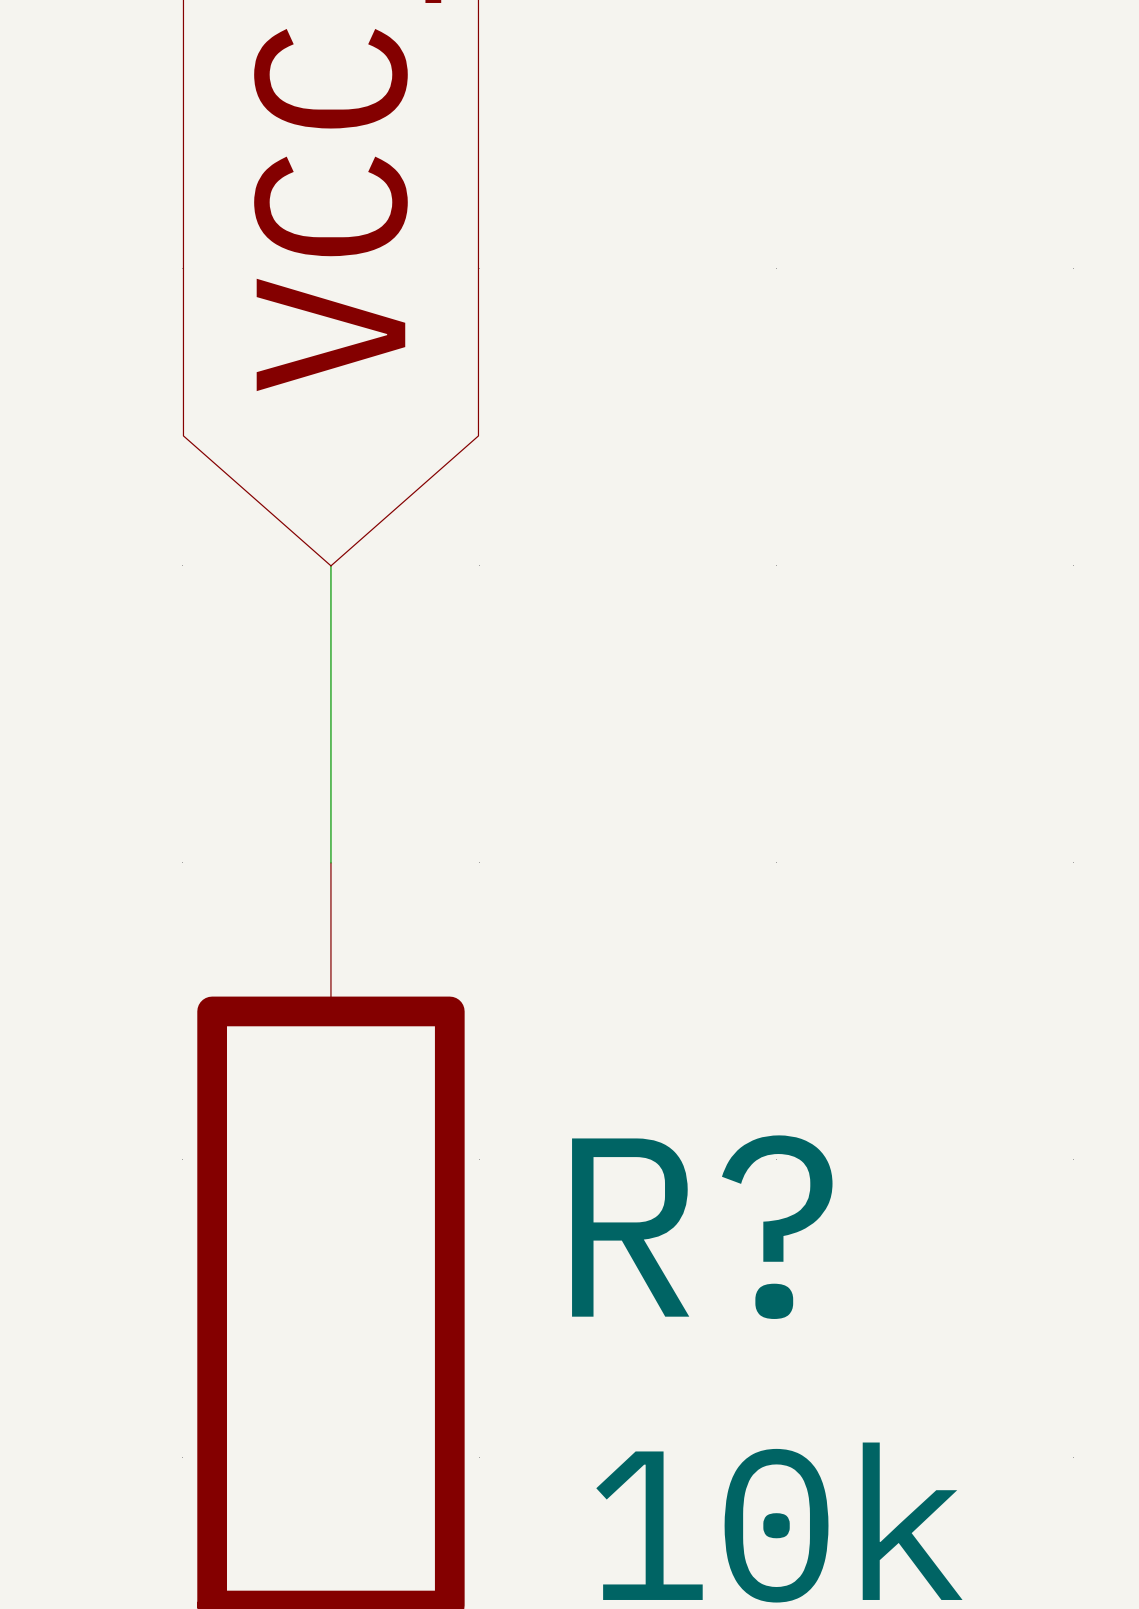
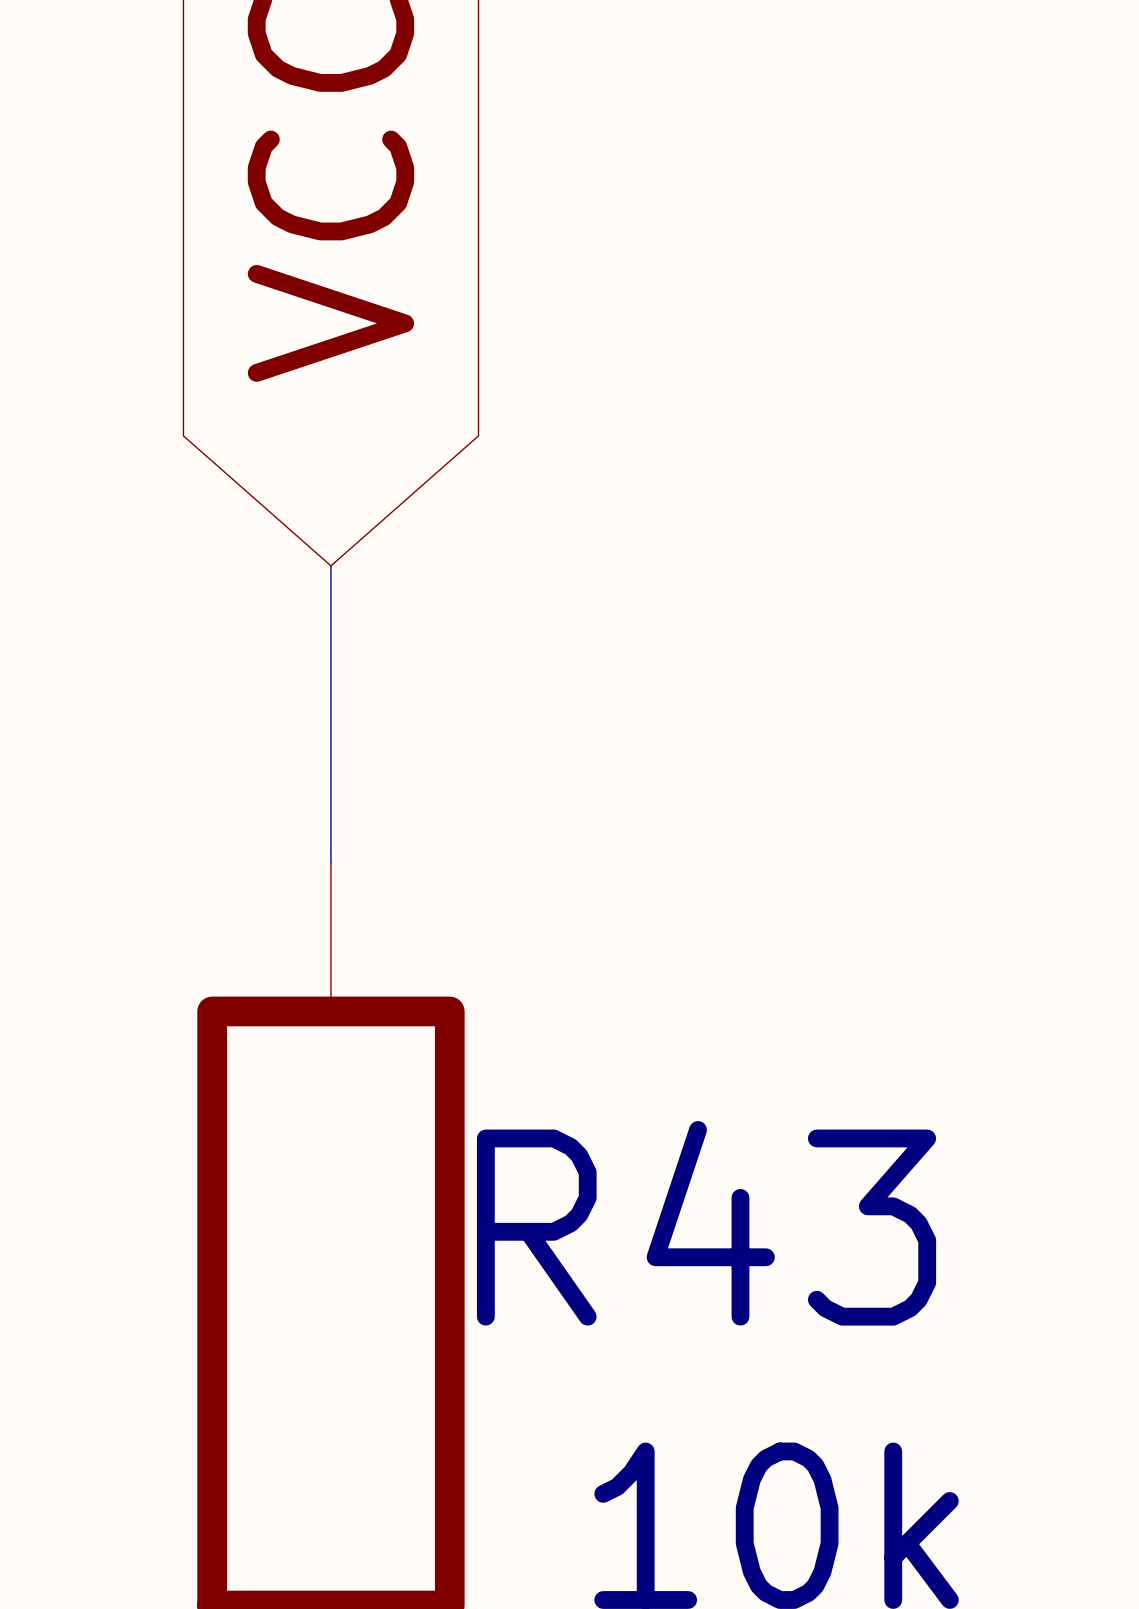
R? name: R? (702, 1227) -> R43 (706, 1223)

